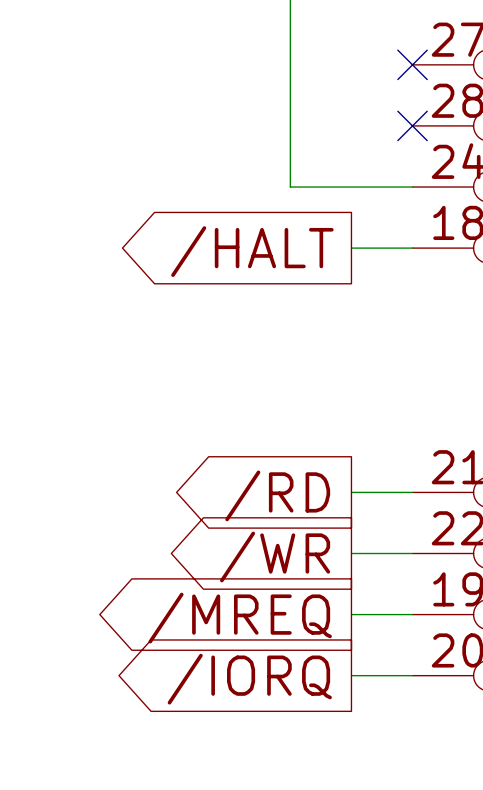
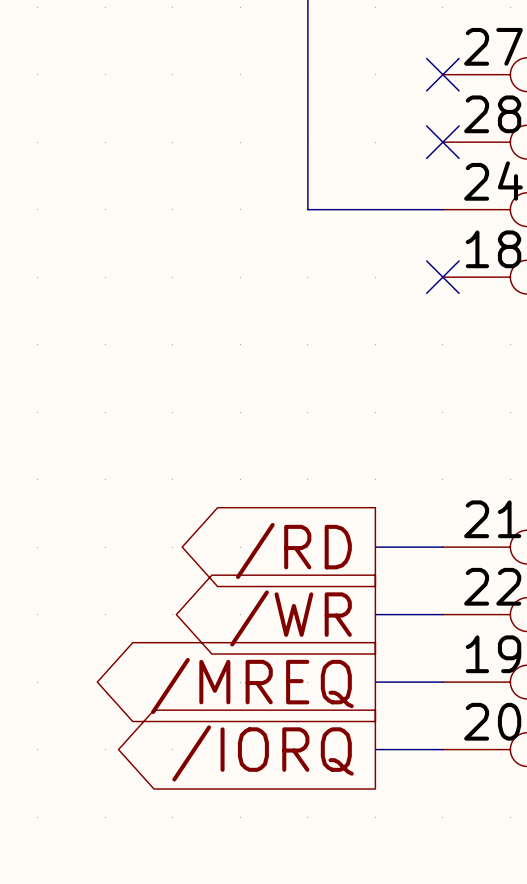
wire: (351, 248) (412, 248) -> none
no-connect mark: none -> (442, 277)
global label: /HALT (252, 251) -> none

